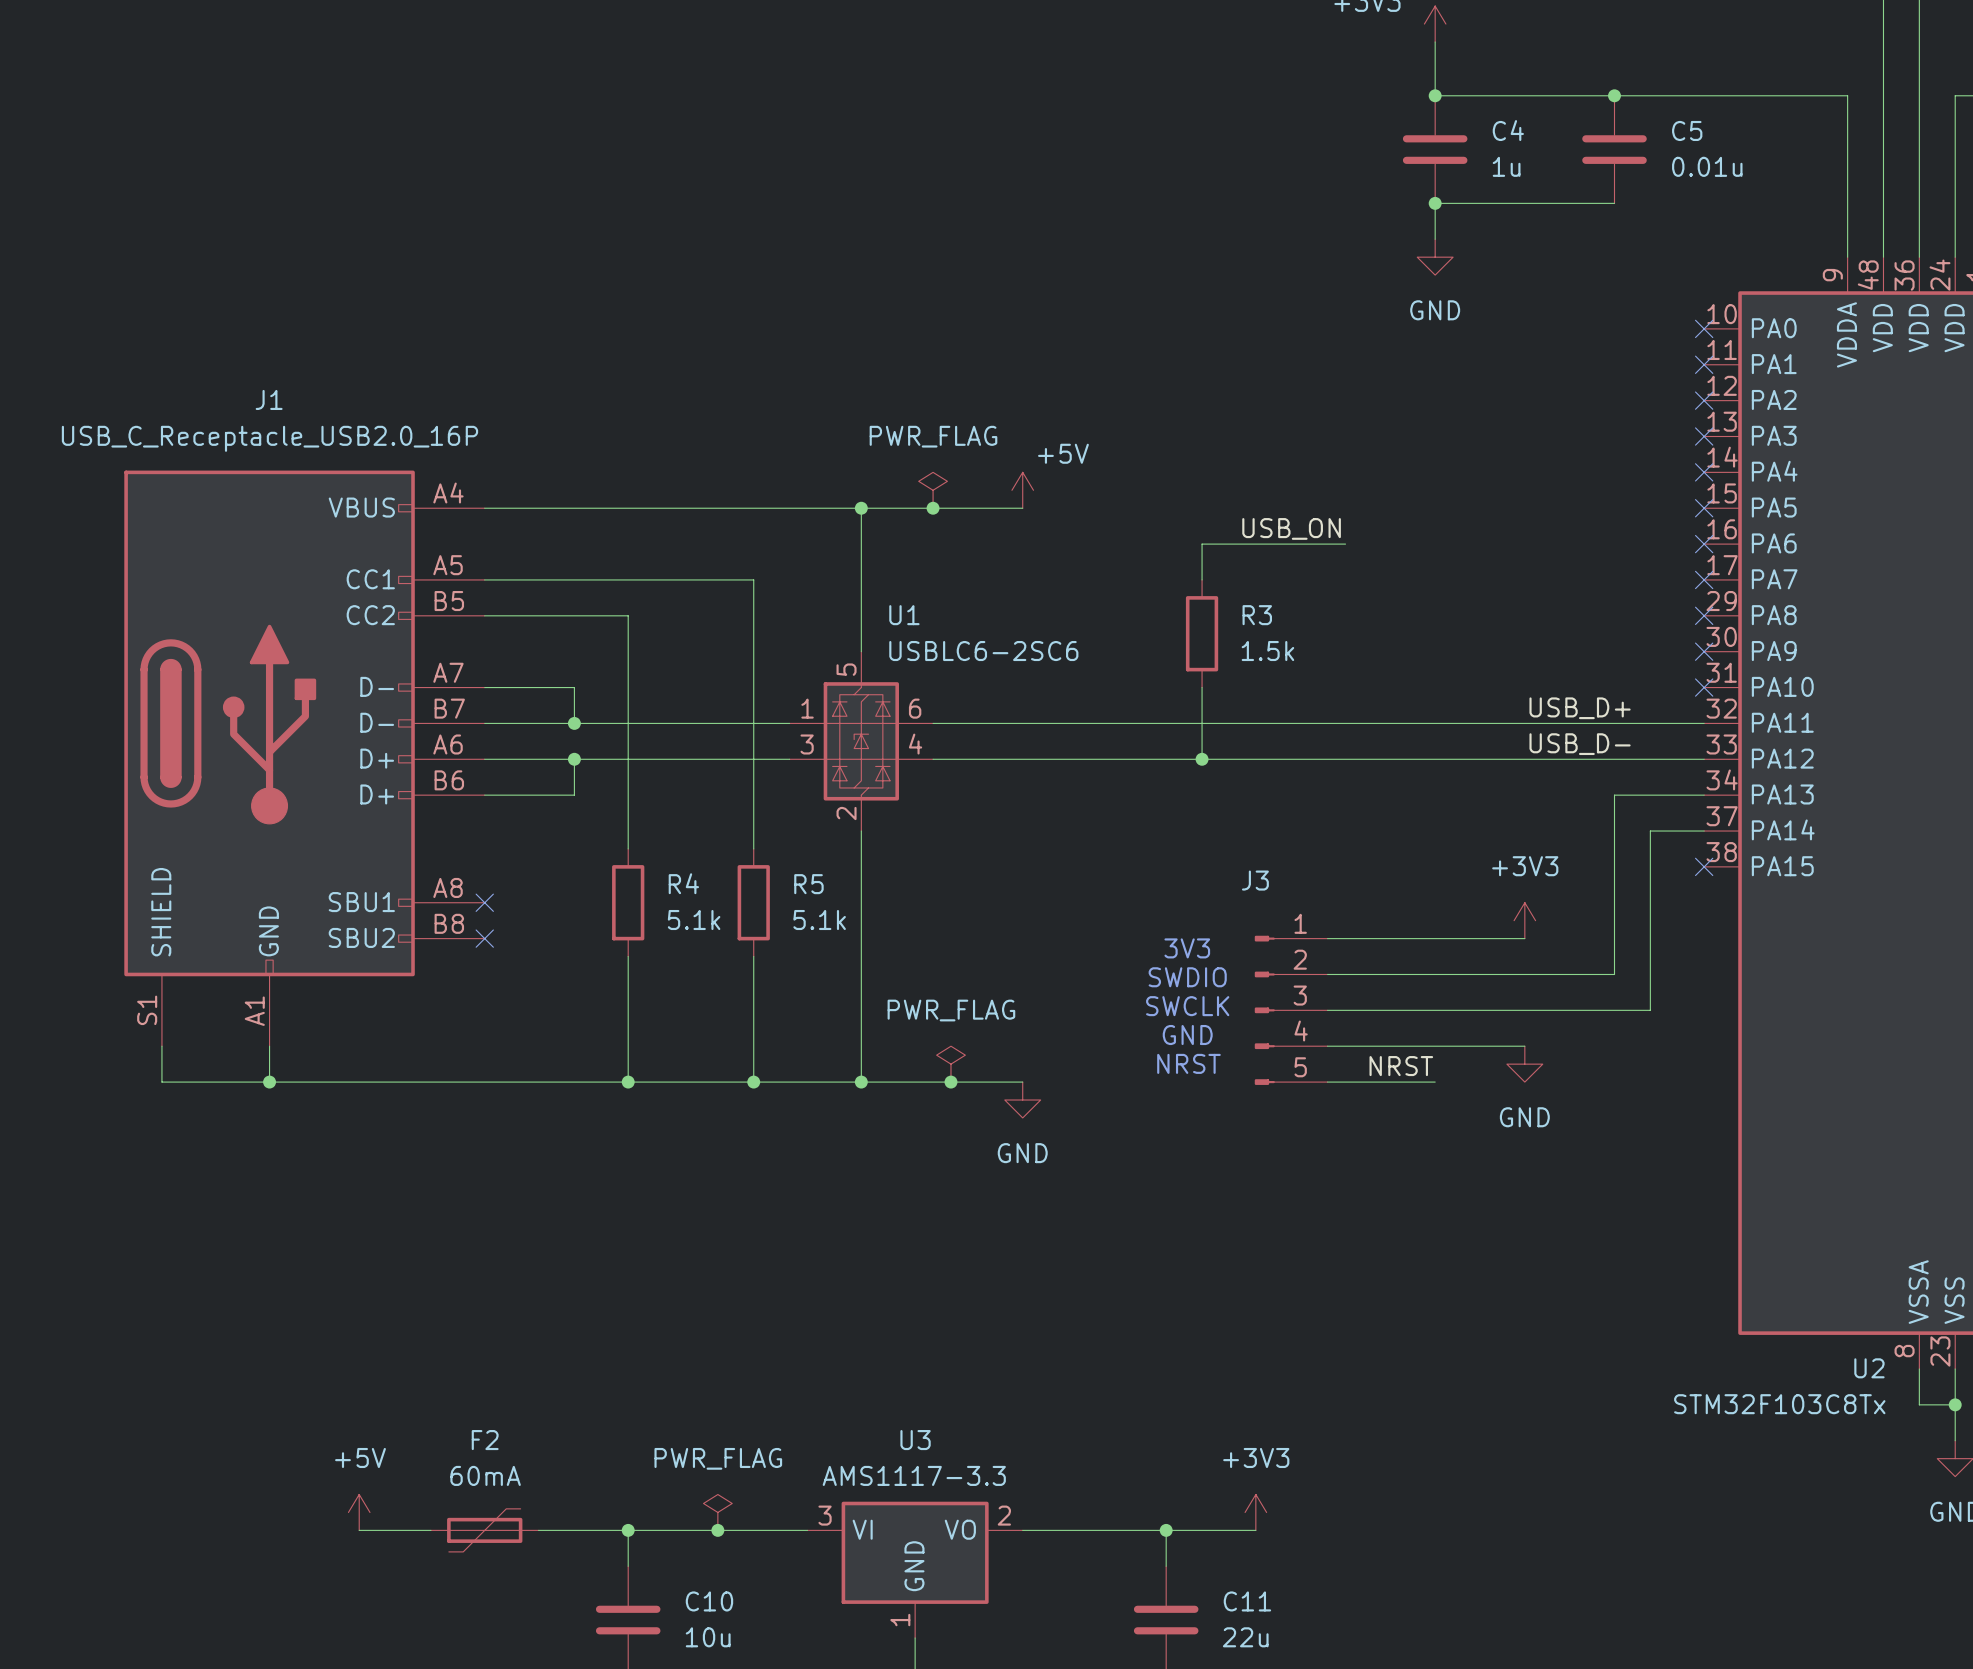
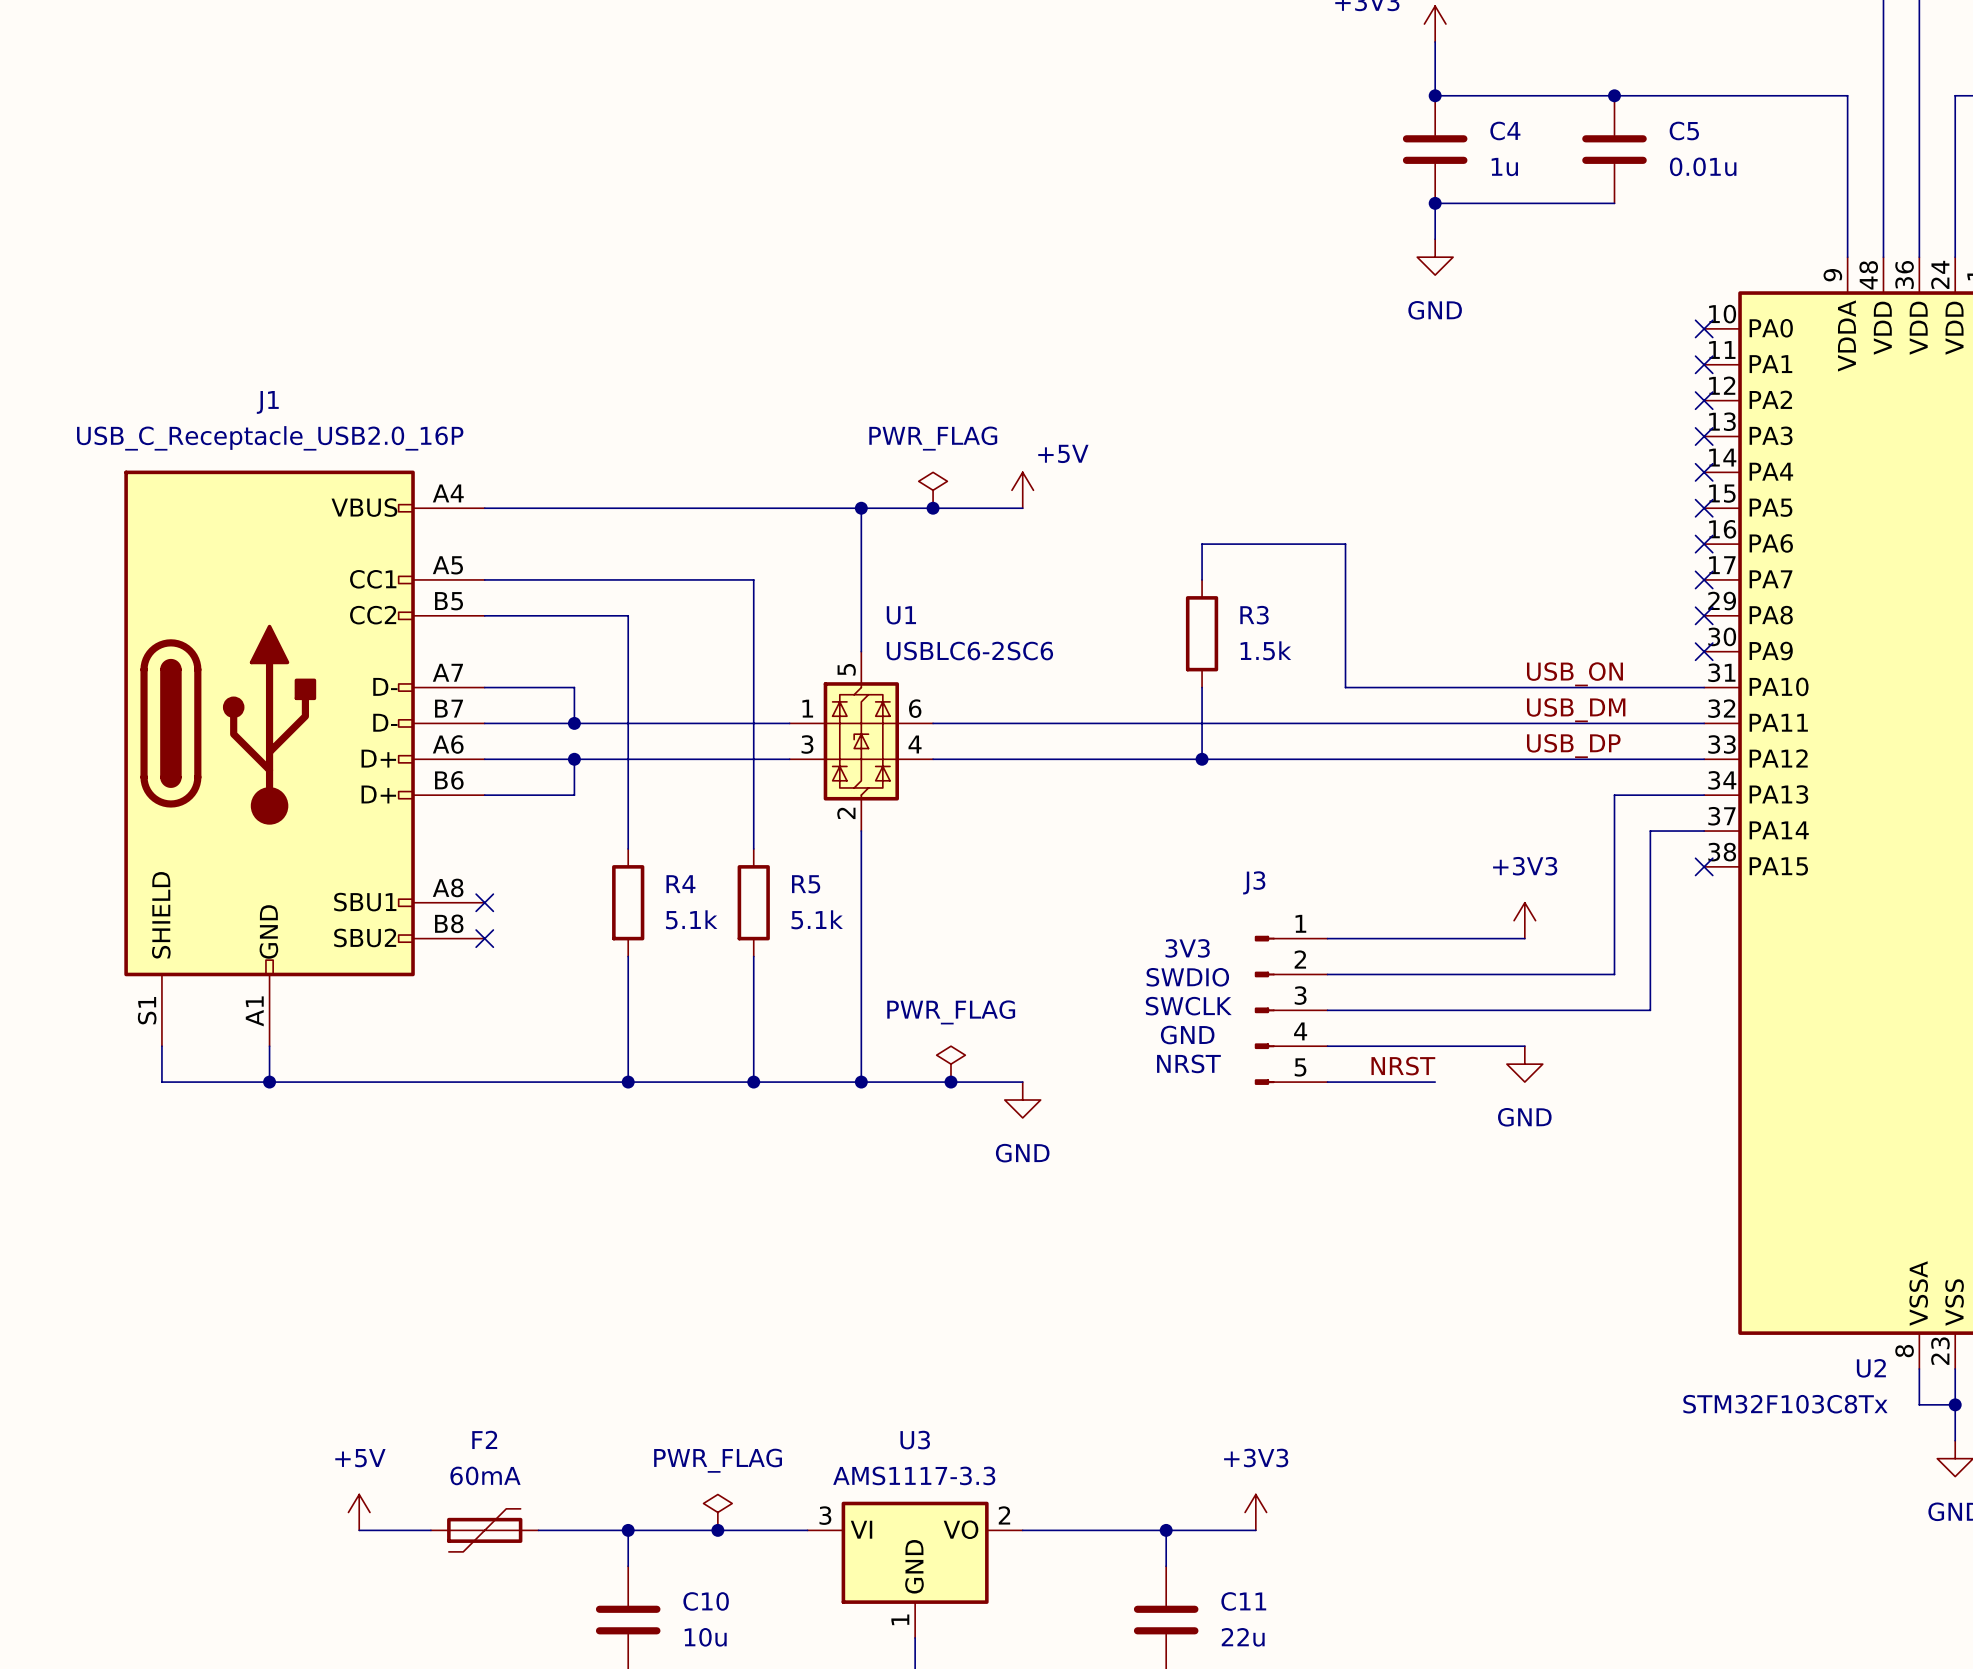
label position: USB_ON (1291, 528) -> USB_ON (1574, 674)
wire: none -> (1345, 544) (1345, 687) (1704, 687)
no-connect mark: (1704, 687) -> none
label: USB_D+ (1580, 708) -> USB_DM (1576, 710)
label: USB_D- (1580, 744) -> USB_DP (1573, 746)

